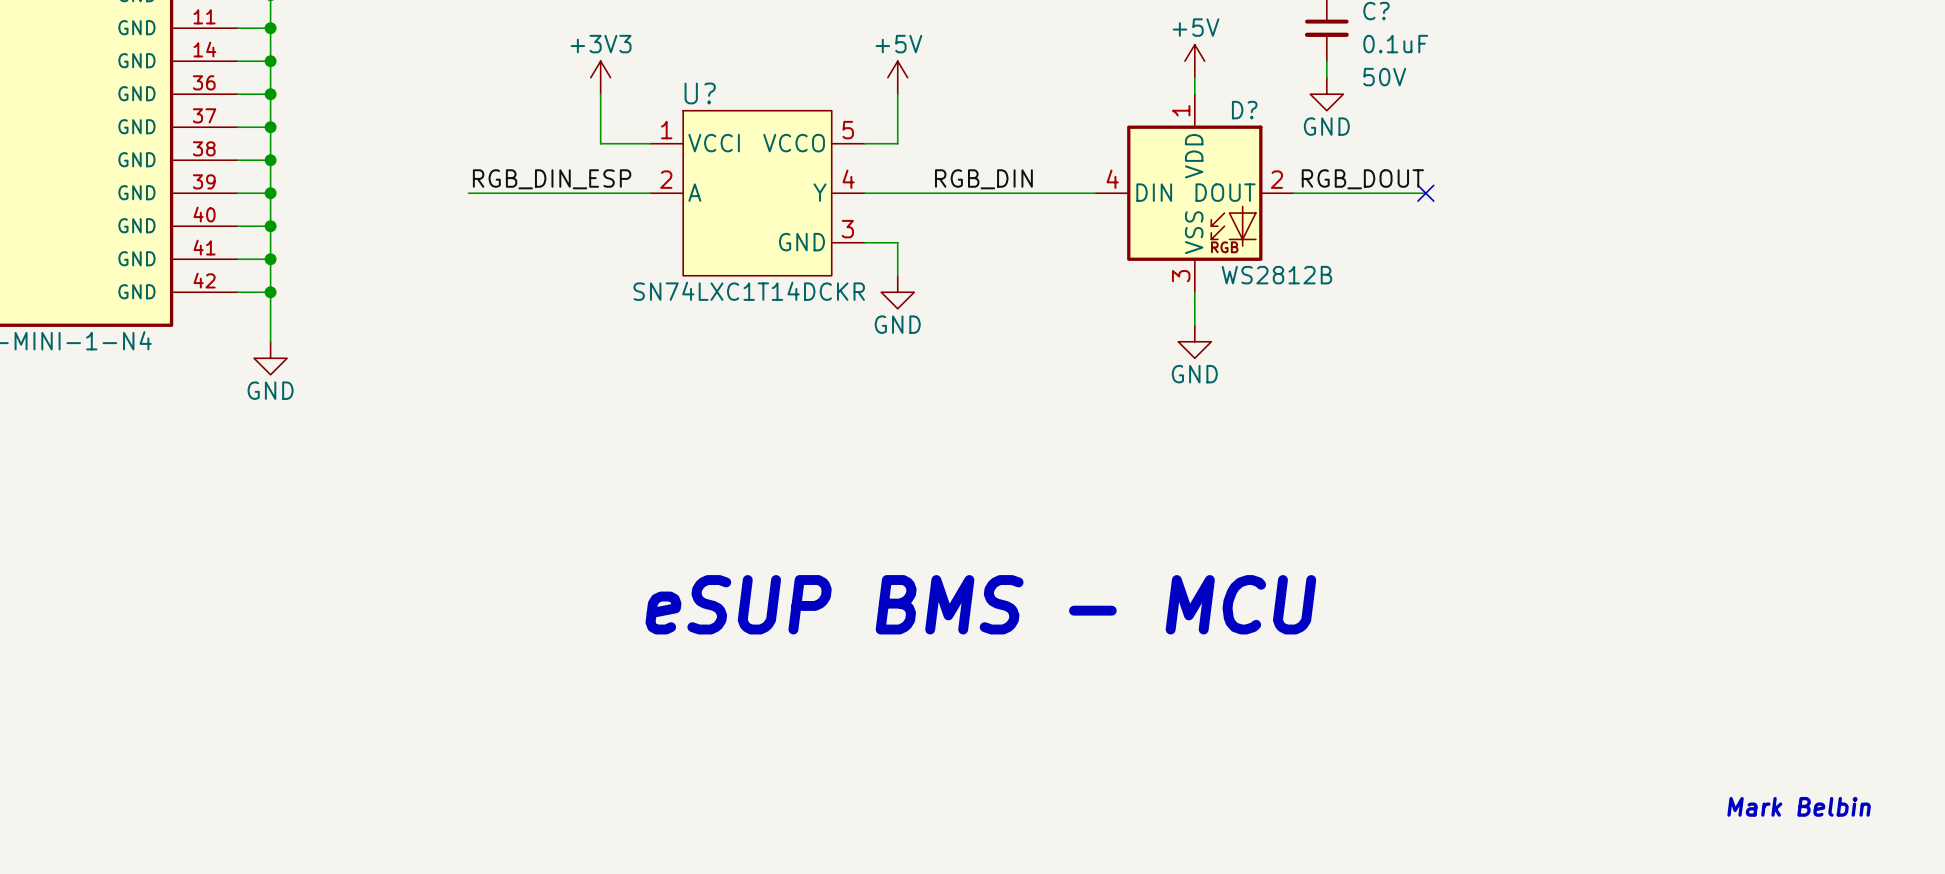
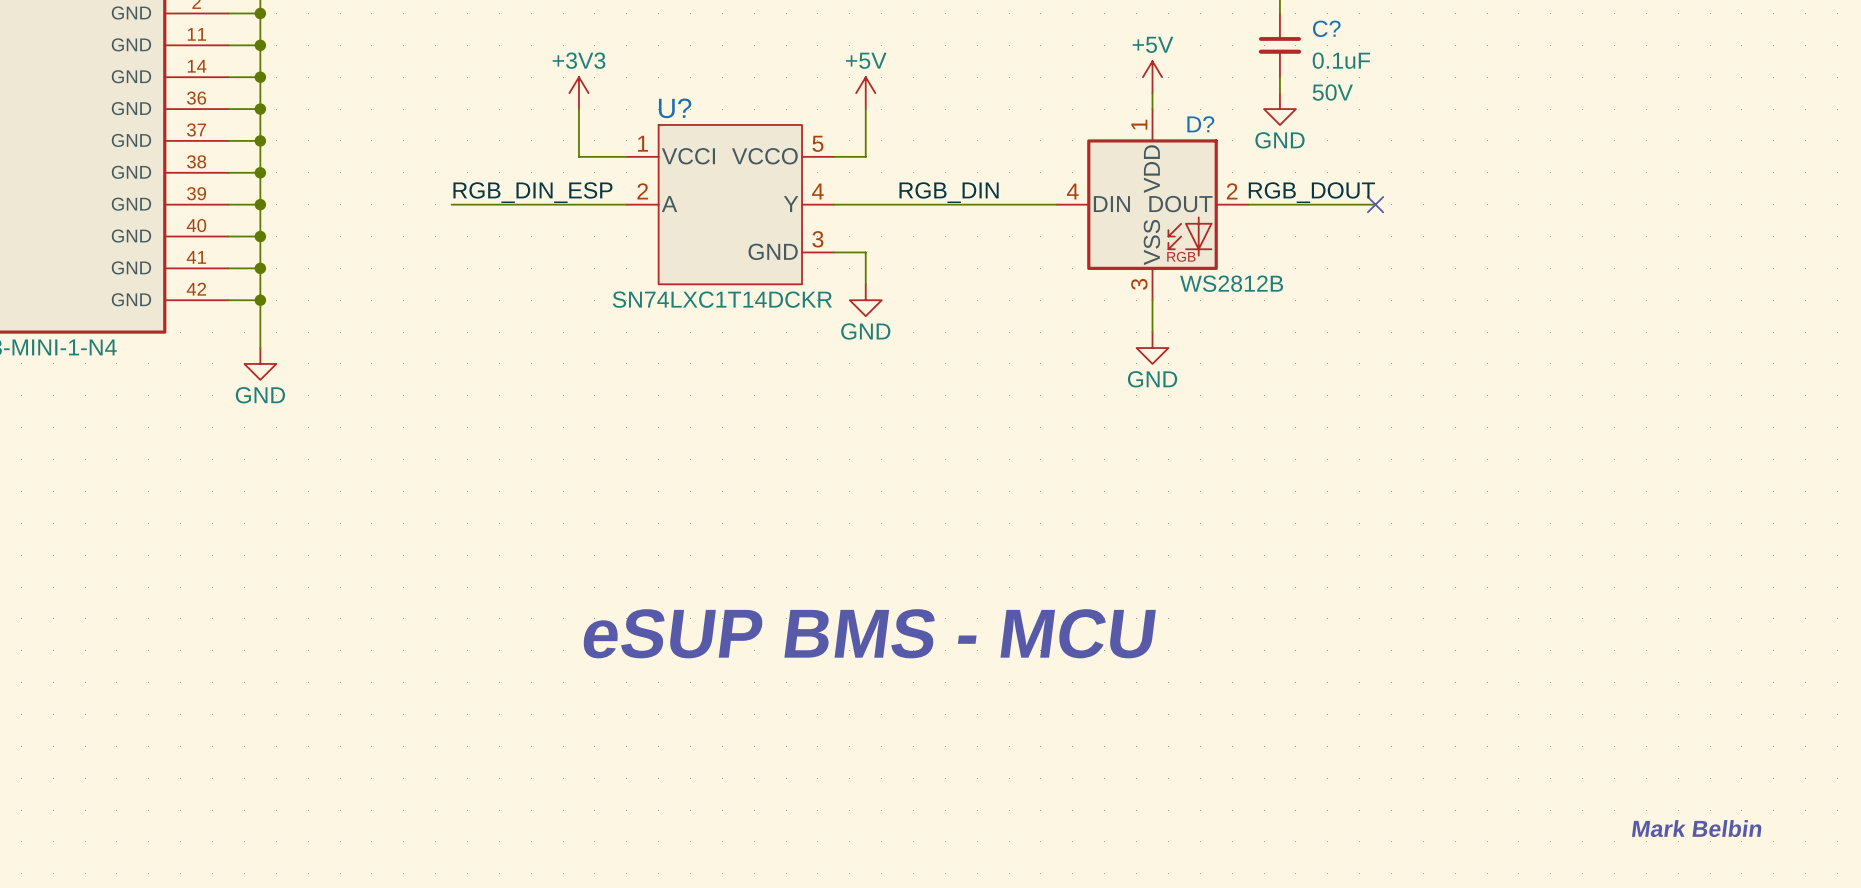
text position: eSUP BMS - MCU (980, 604) -> eSUP BMS - MCU (869, 633)
text position: Mark Belbin (1799, 806) -> Mark Belbin (1696, 828)

